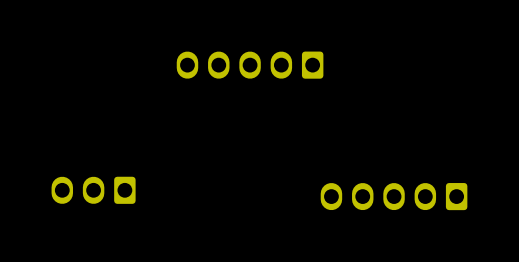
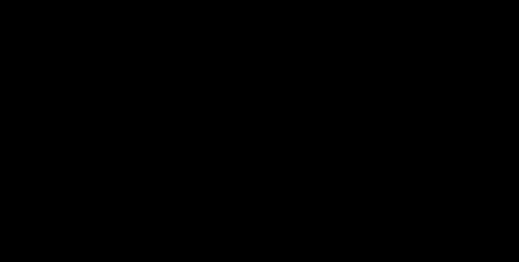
part: (250, 65) -> none
part: (93, 190) -> none
part: (394, 196) -> none

